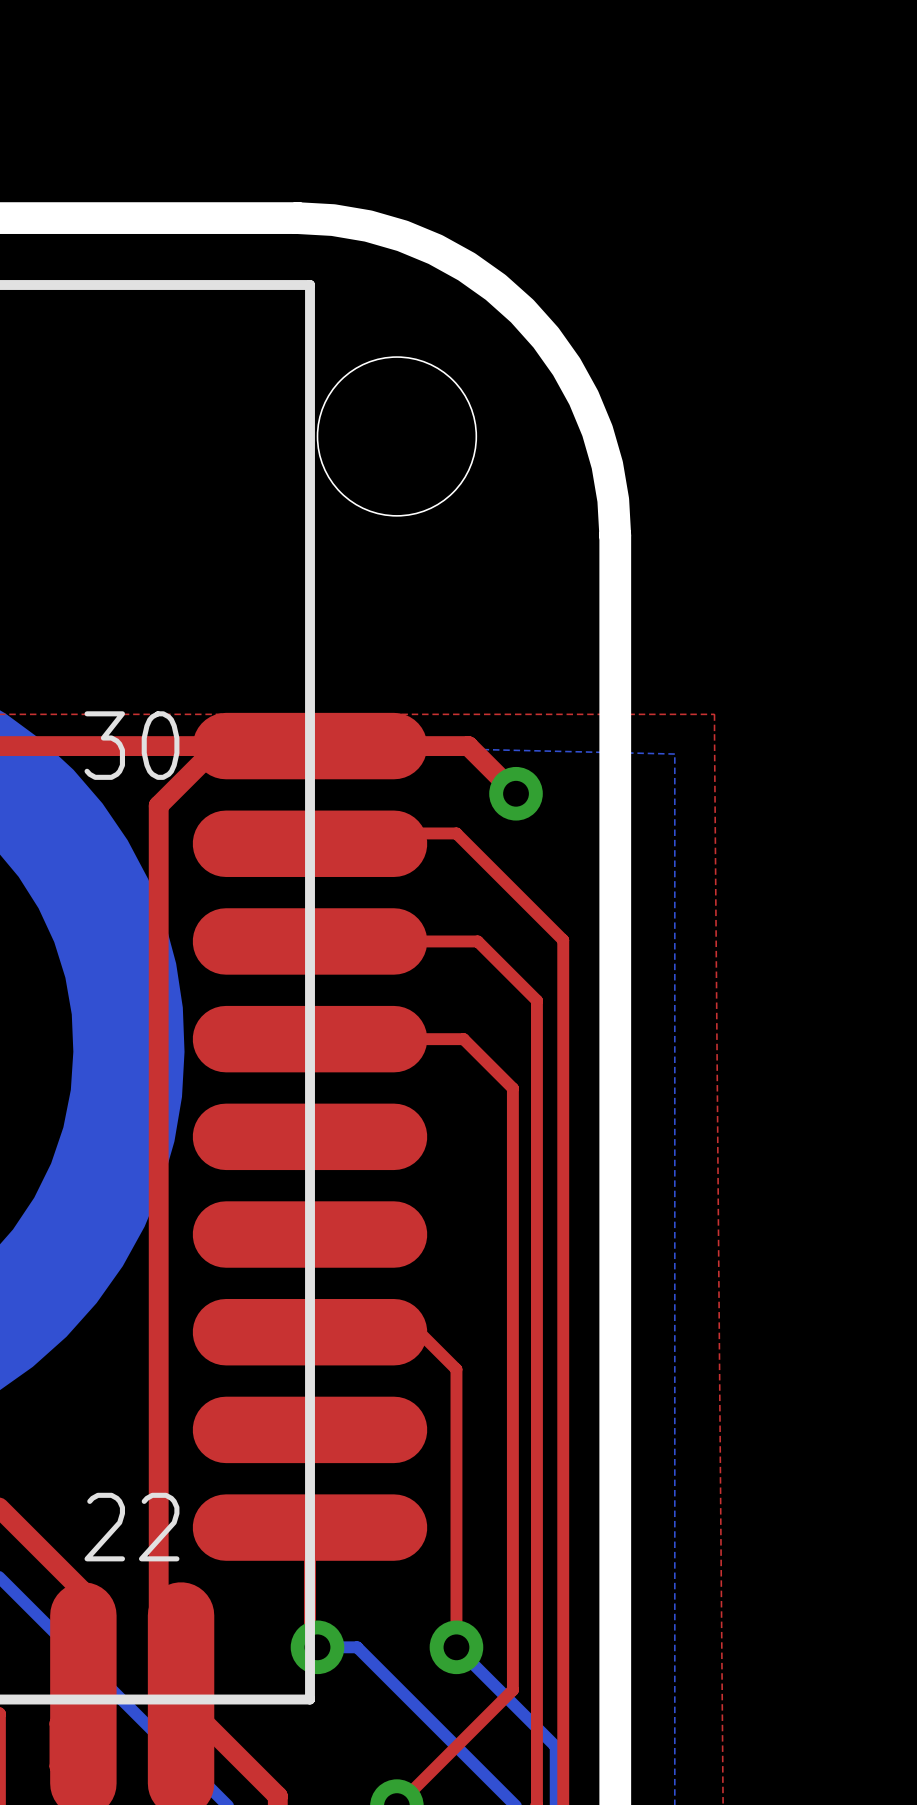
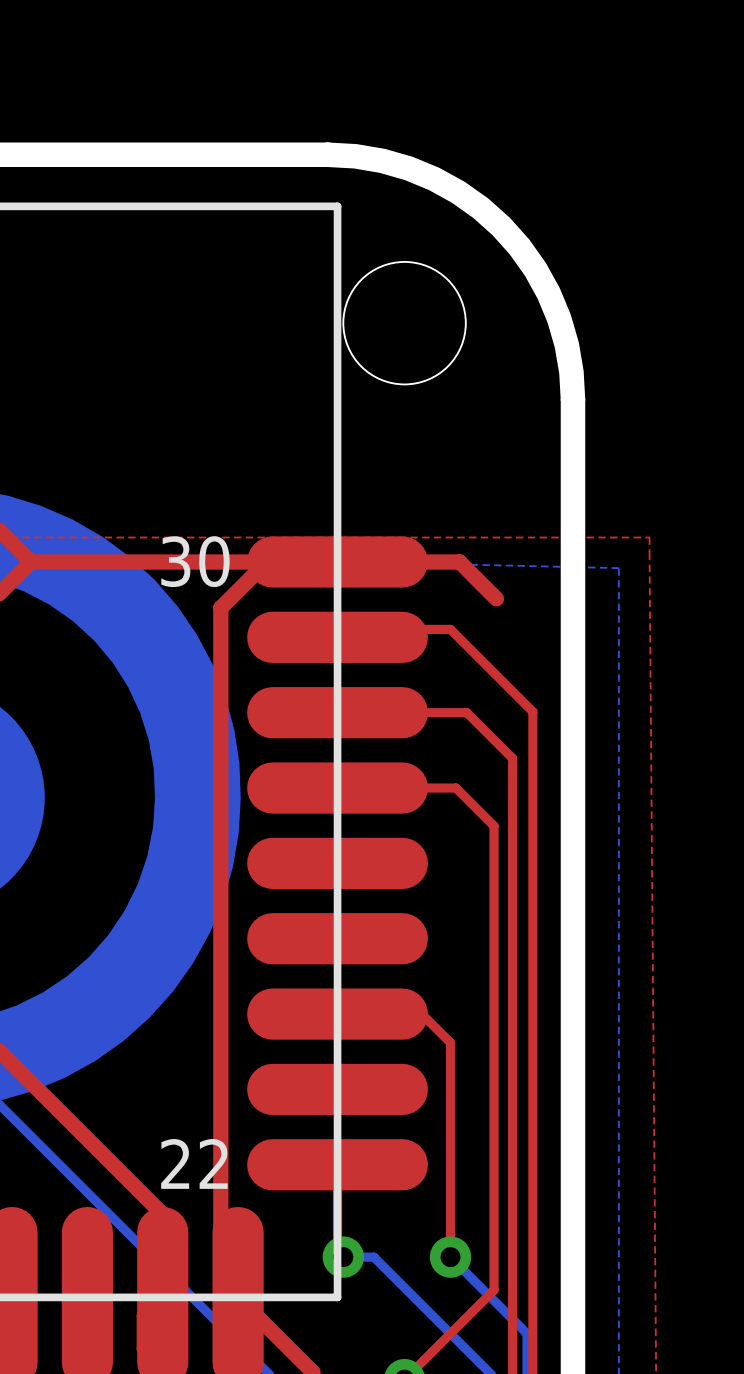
via: (516, 793) -> none

